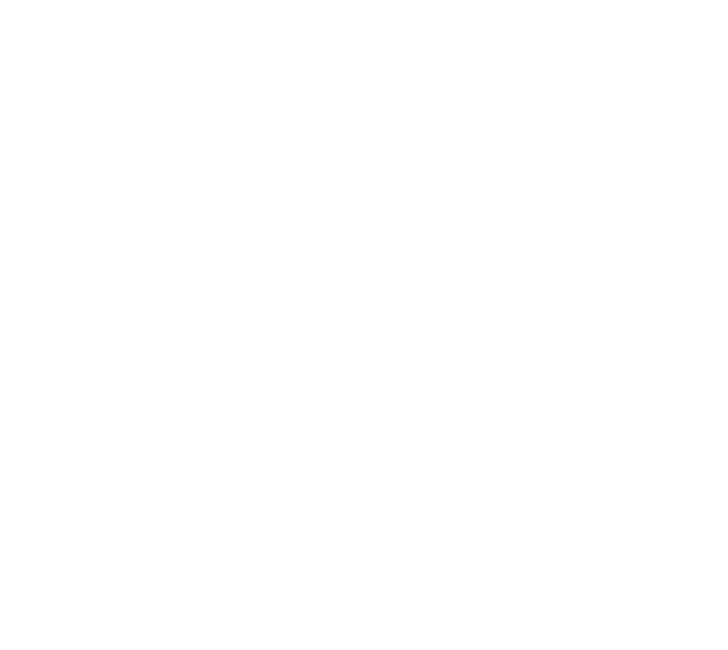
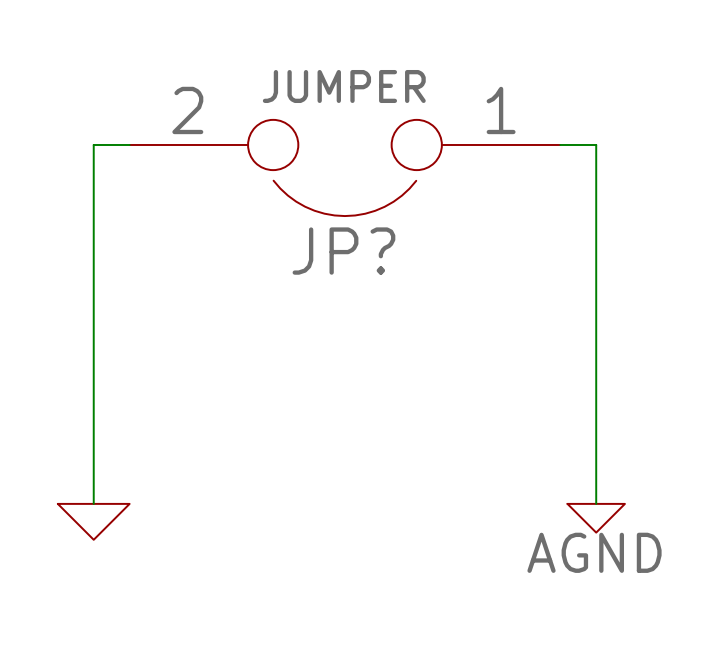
wire: none -> (129, 144) (93, 144) (93, 503)
wire: none -> (560, 144) (596, 144) (596, 503)
JP?: none -> JUMPER (344, 167)
power symbol: none -> AGND (596, 518)
power symbol: none -> (93, 521)

